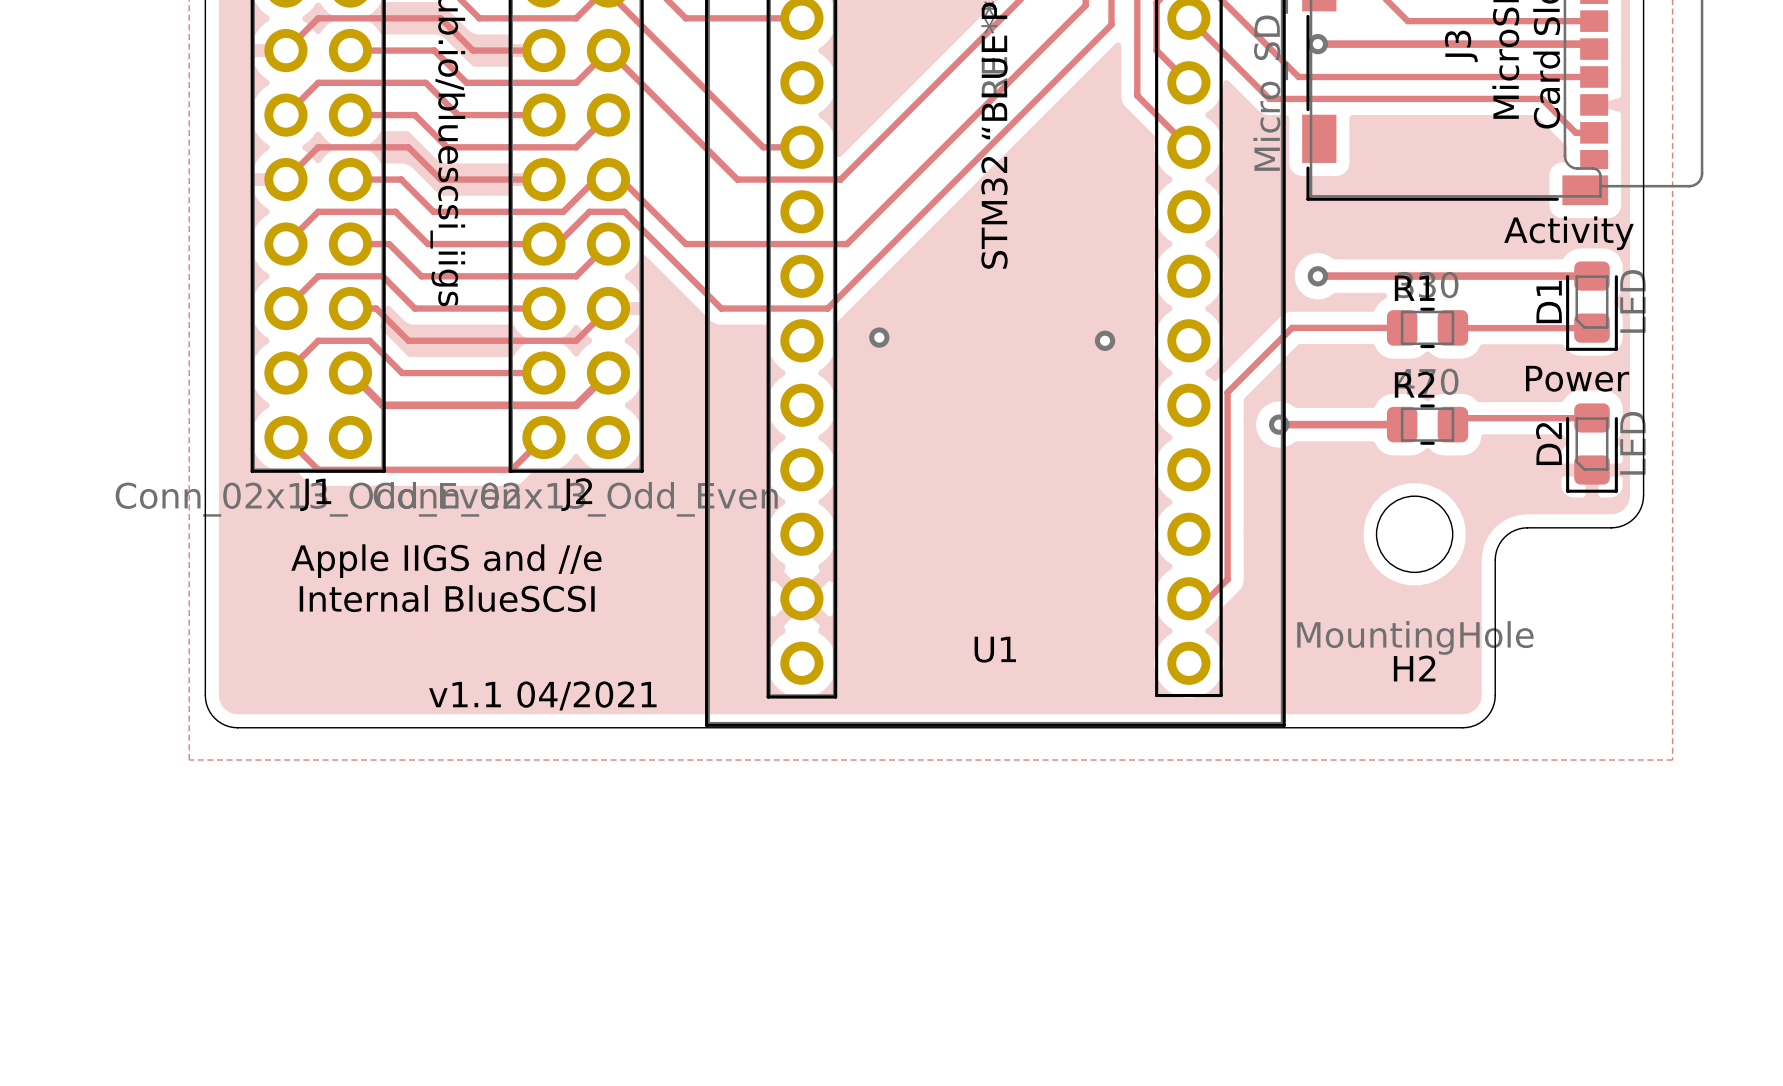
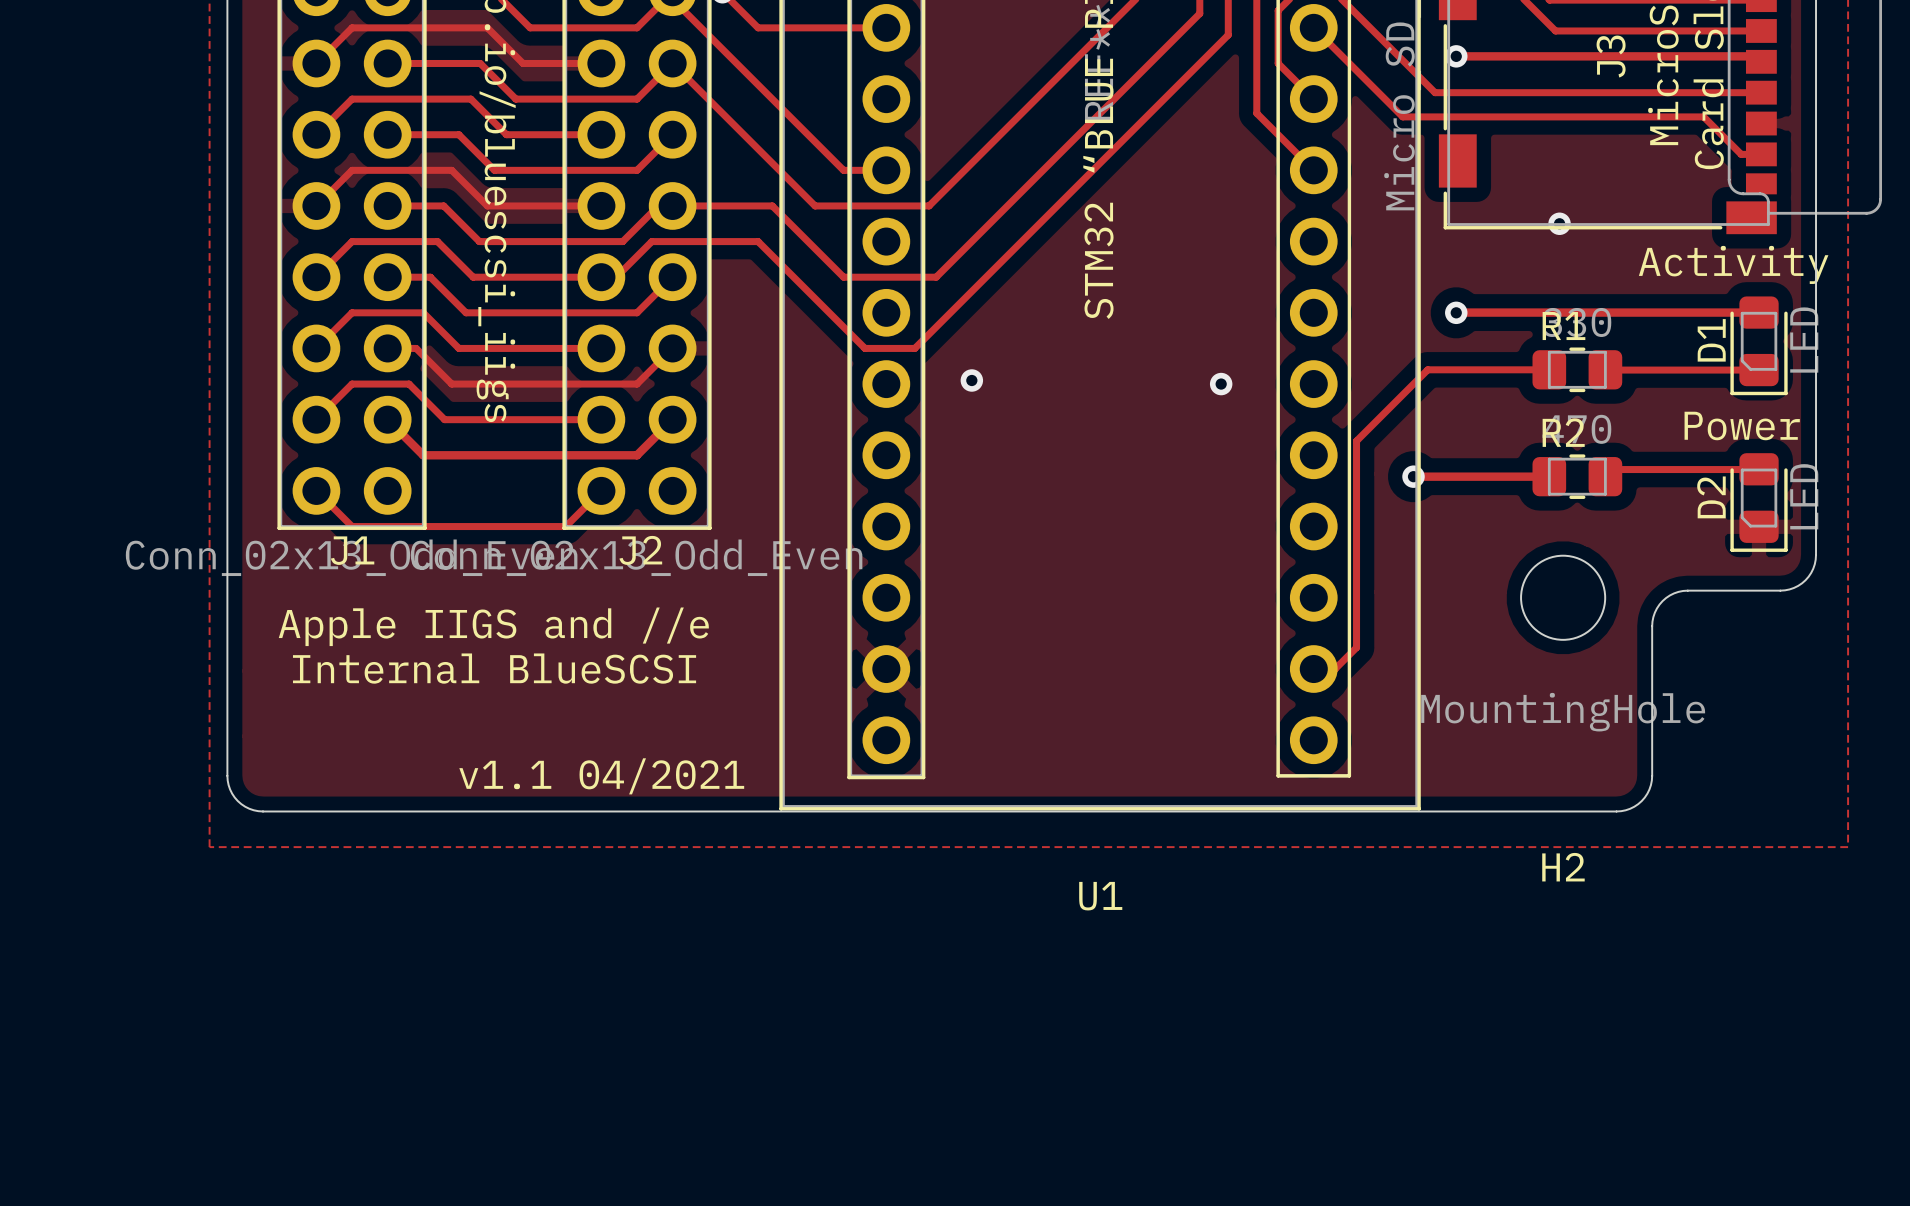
track: (621, 179) (685, 244) (763, 244) -> (686, 205) (772, 205) (843, 277)
via: none -> (1559, 223)
track: (624, 211) (721, 308) (782, 308) -> (690, 241) (758, 241) (864, 348)
U1 name position: U1 (995, 649) -> U1 (1100, 896)
H2 name position: H2 (1414, 668) -> H2 (1563, 867)

